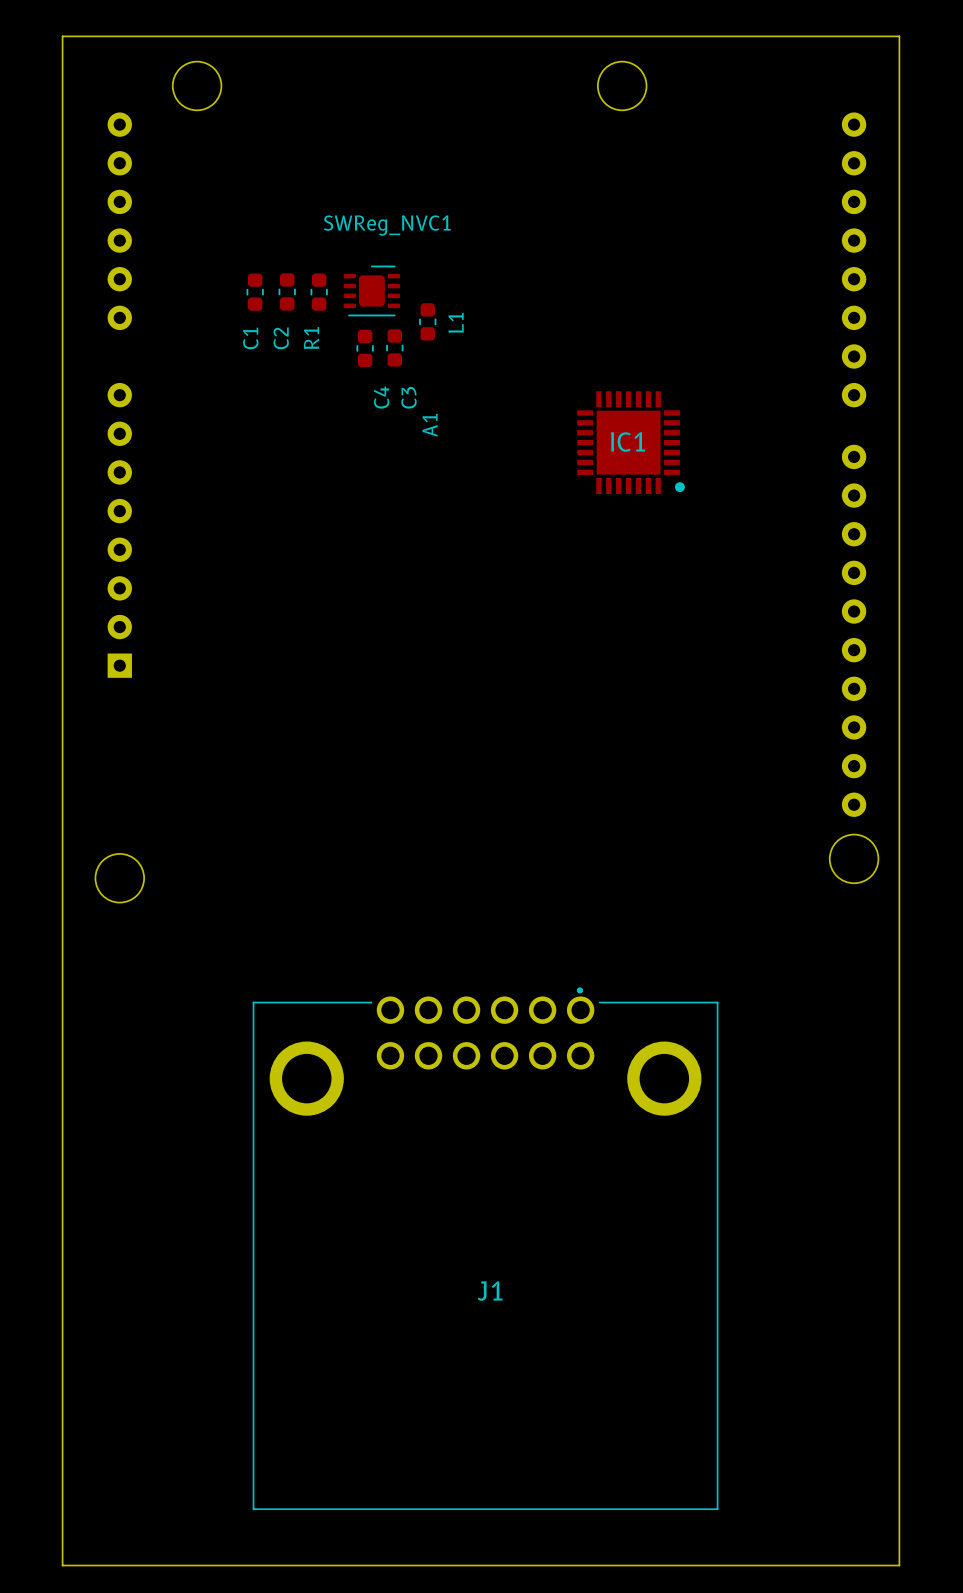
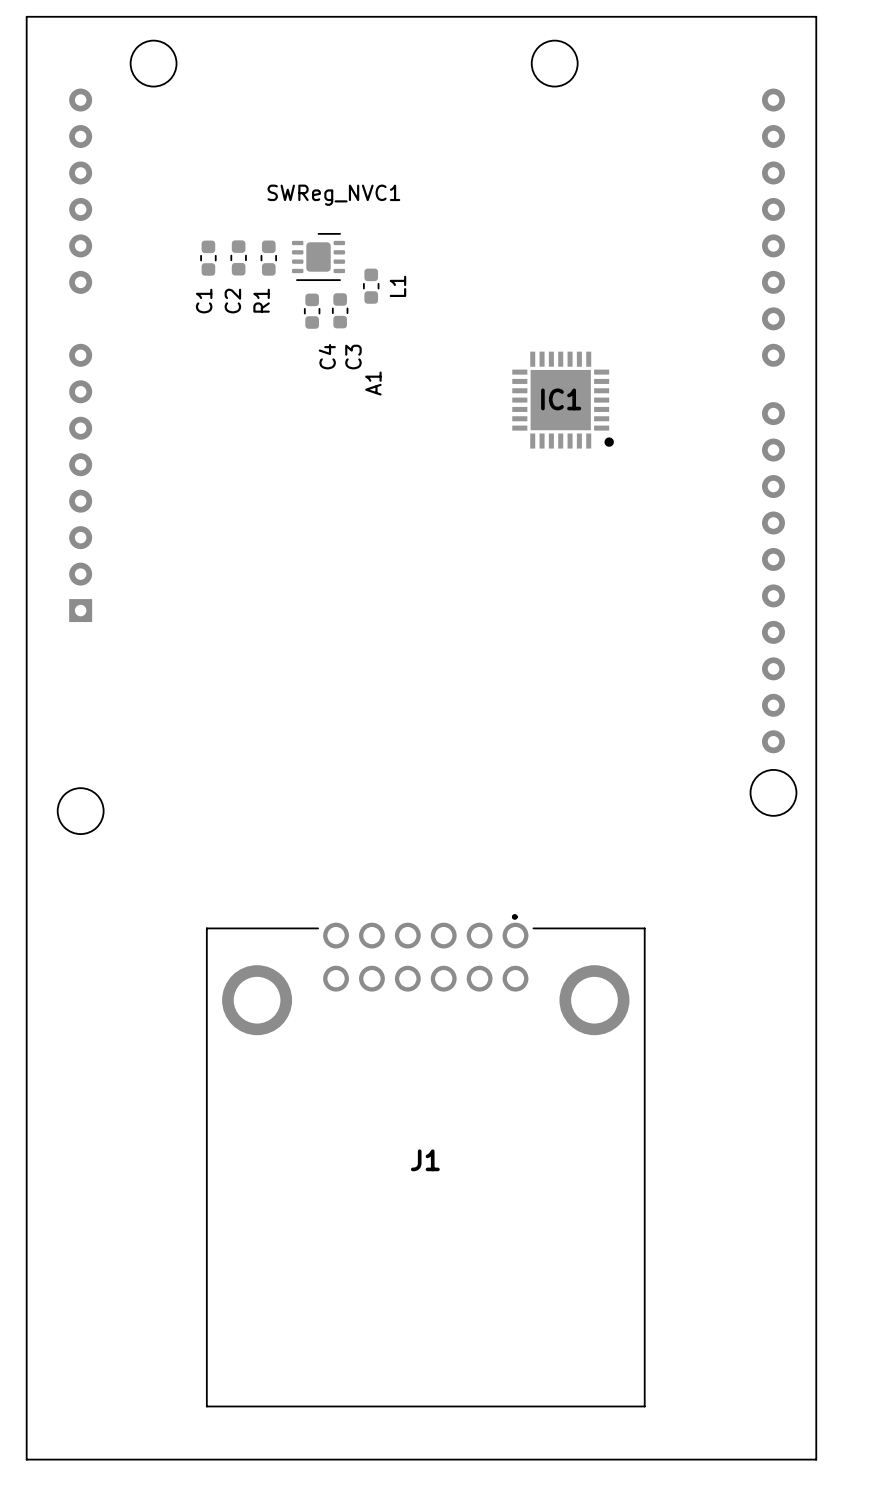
J1 name position: J1 (490, 1291) -> J1 (425, 1160)

